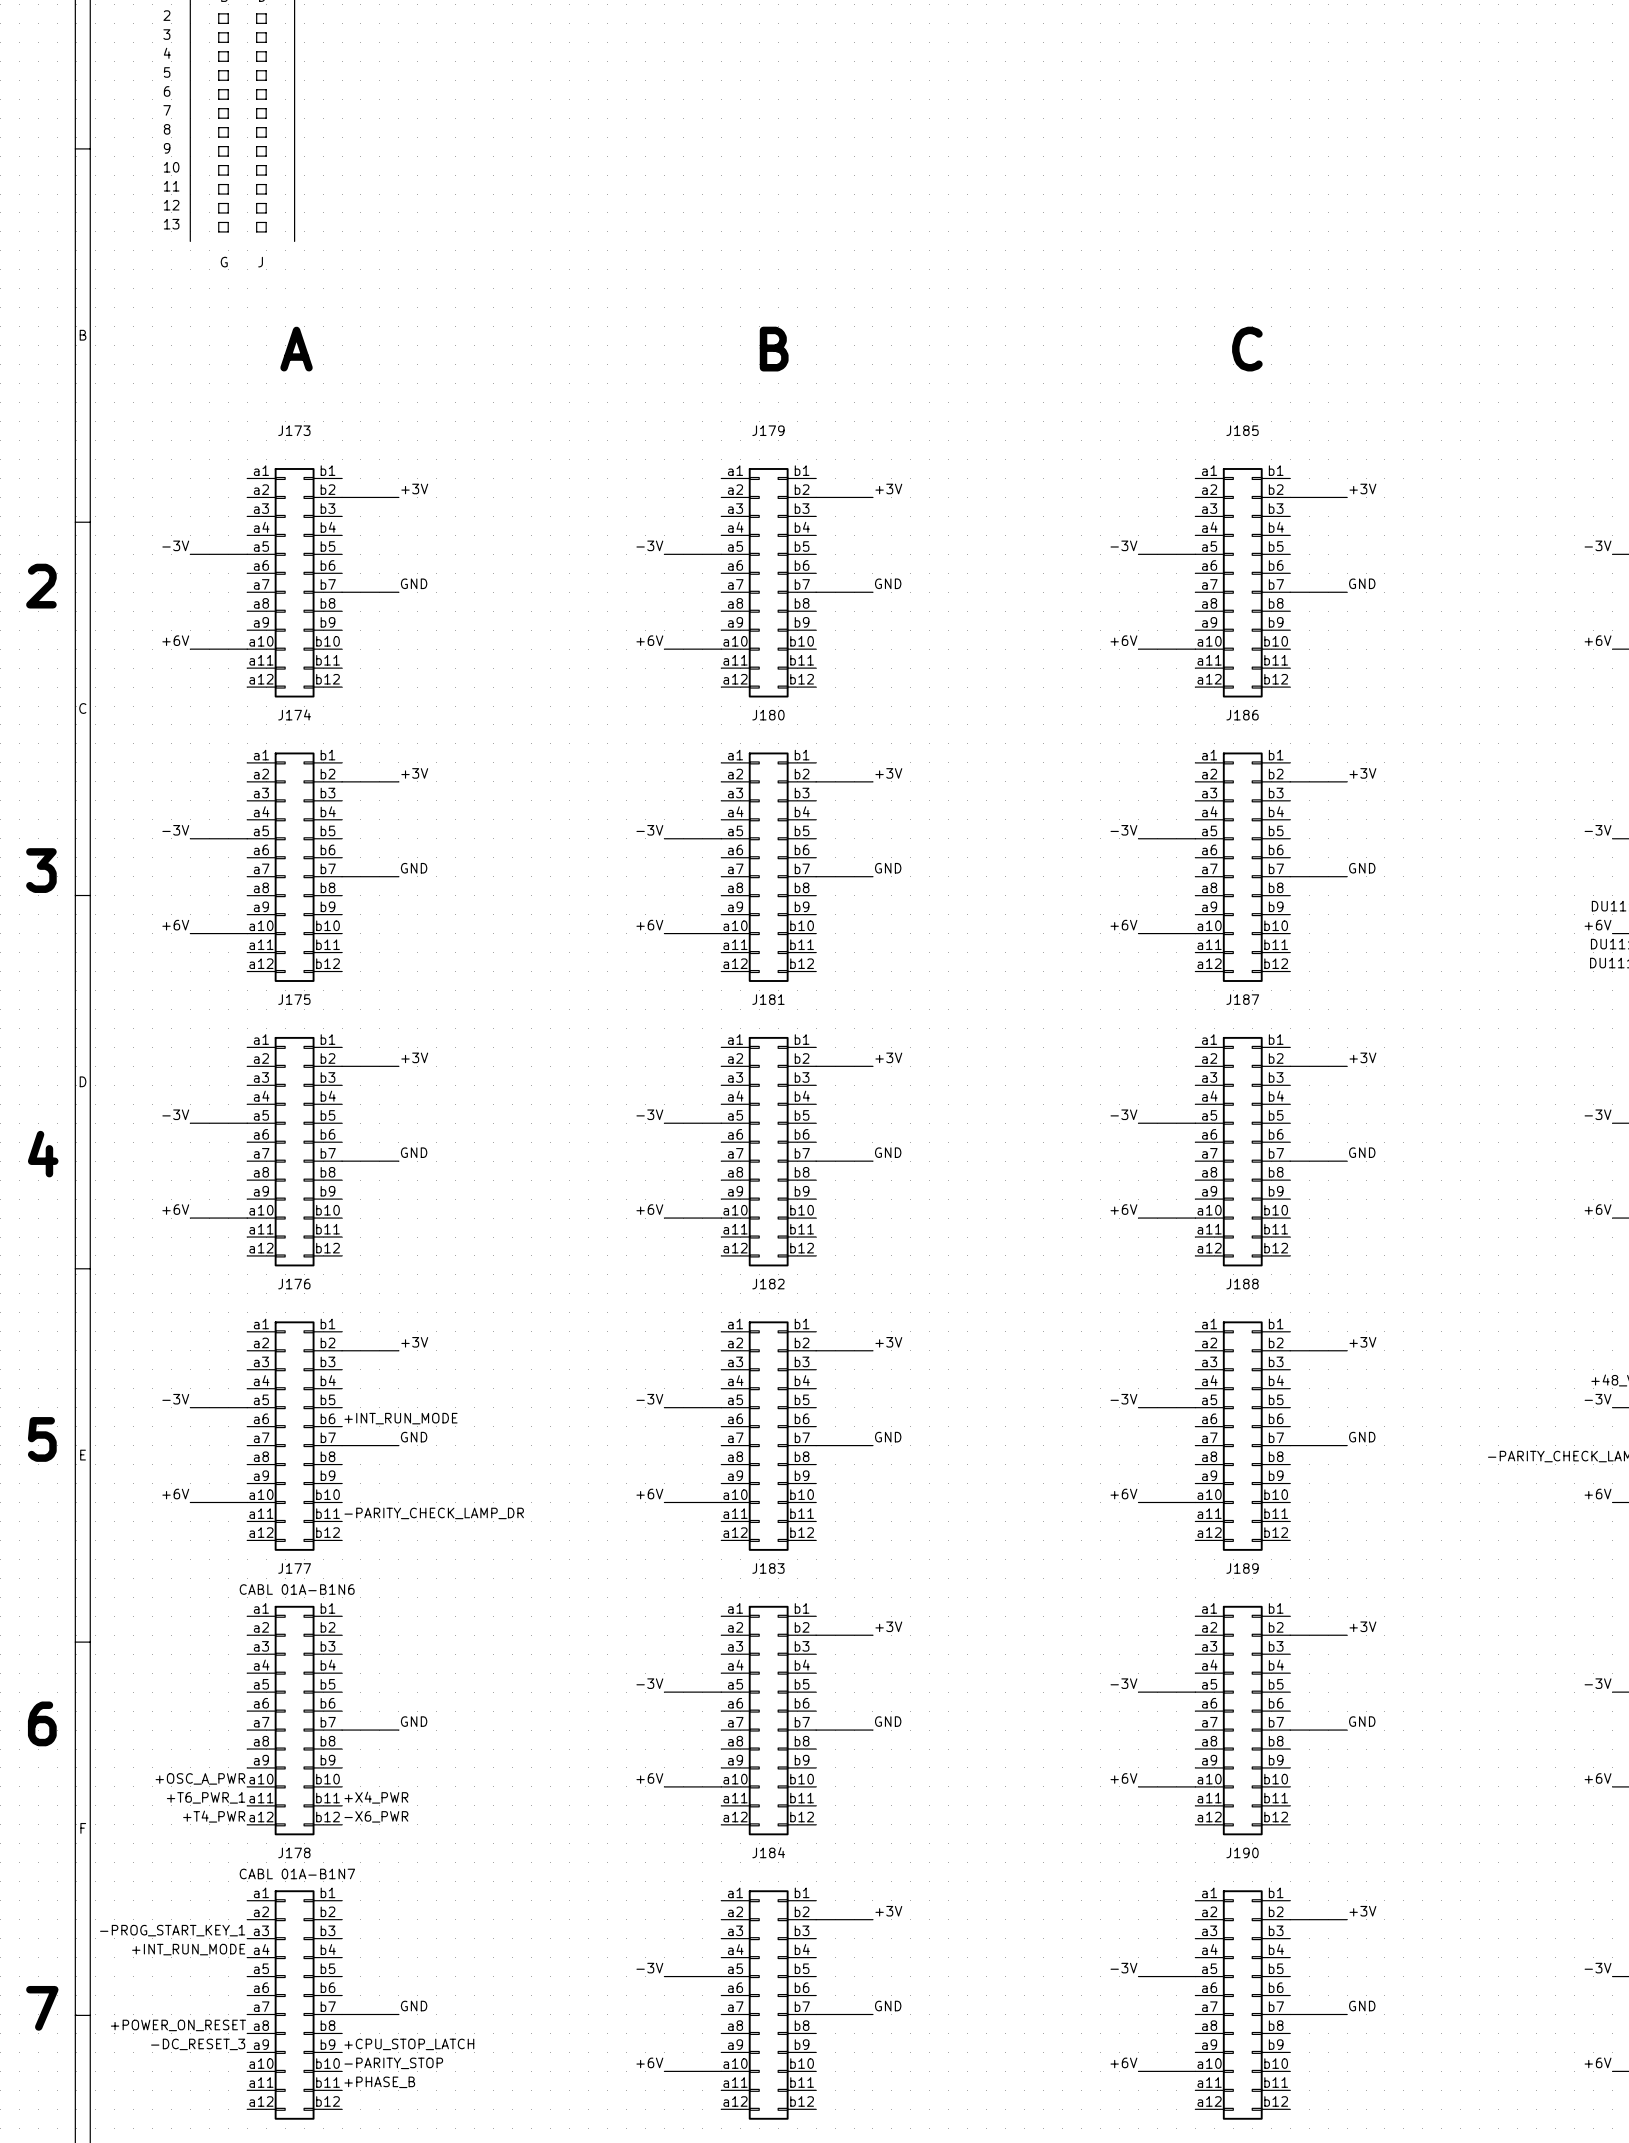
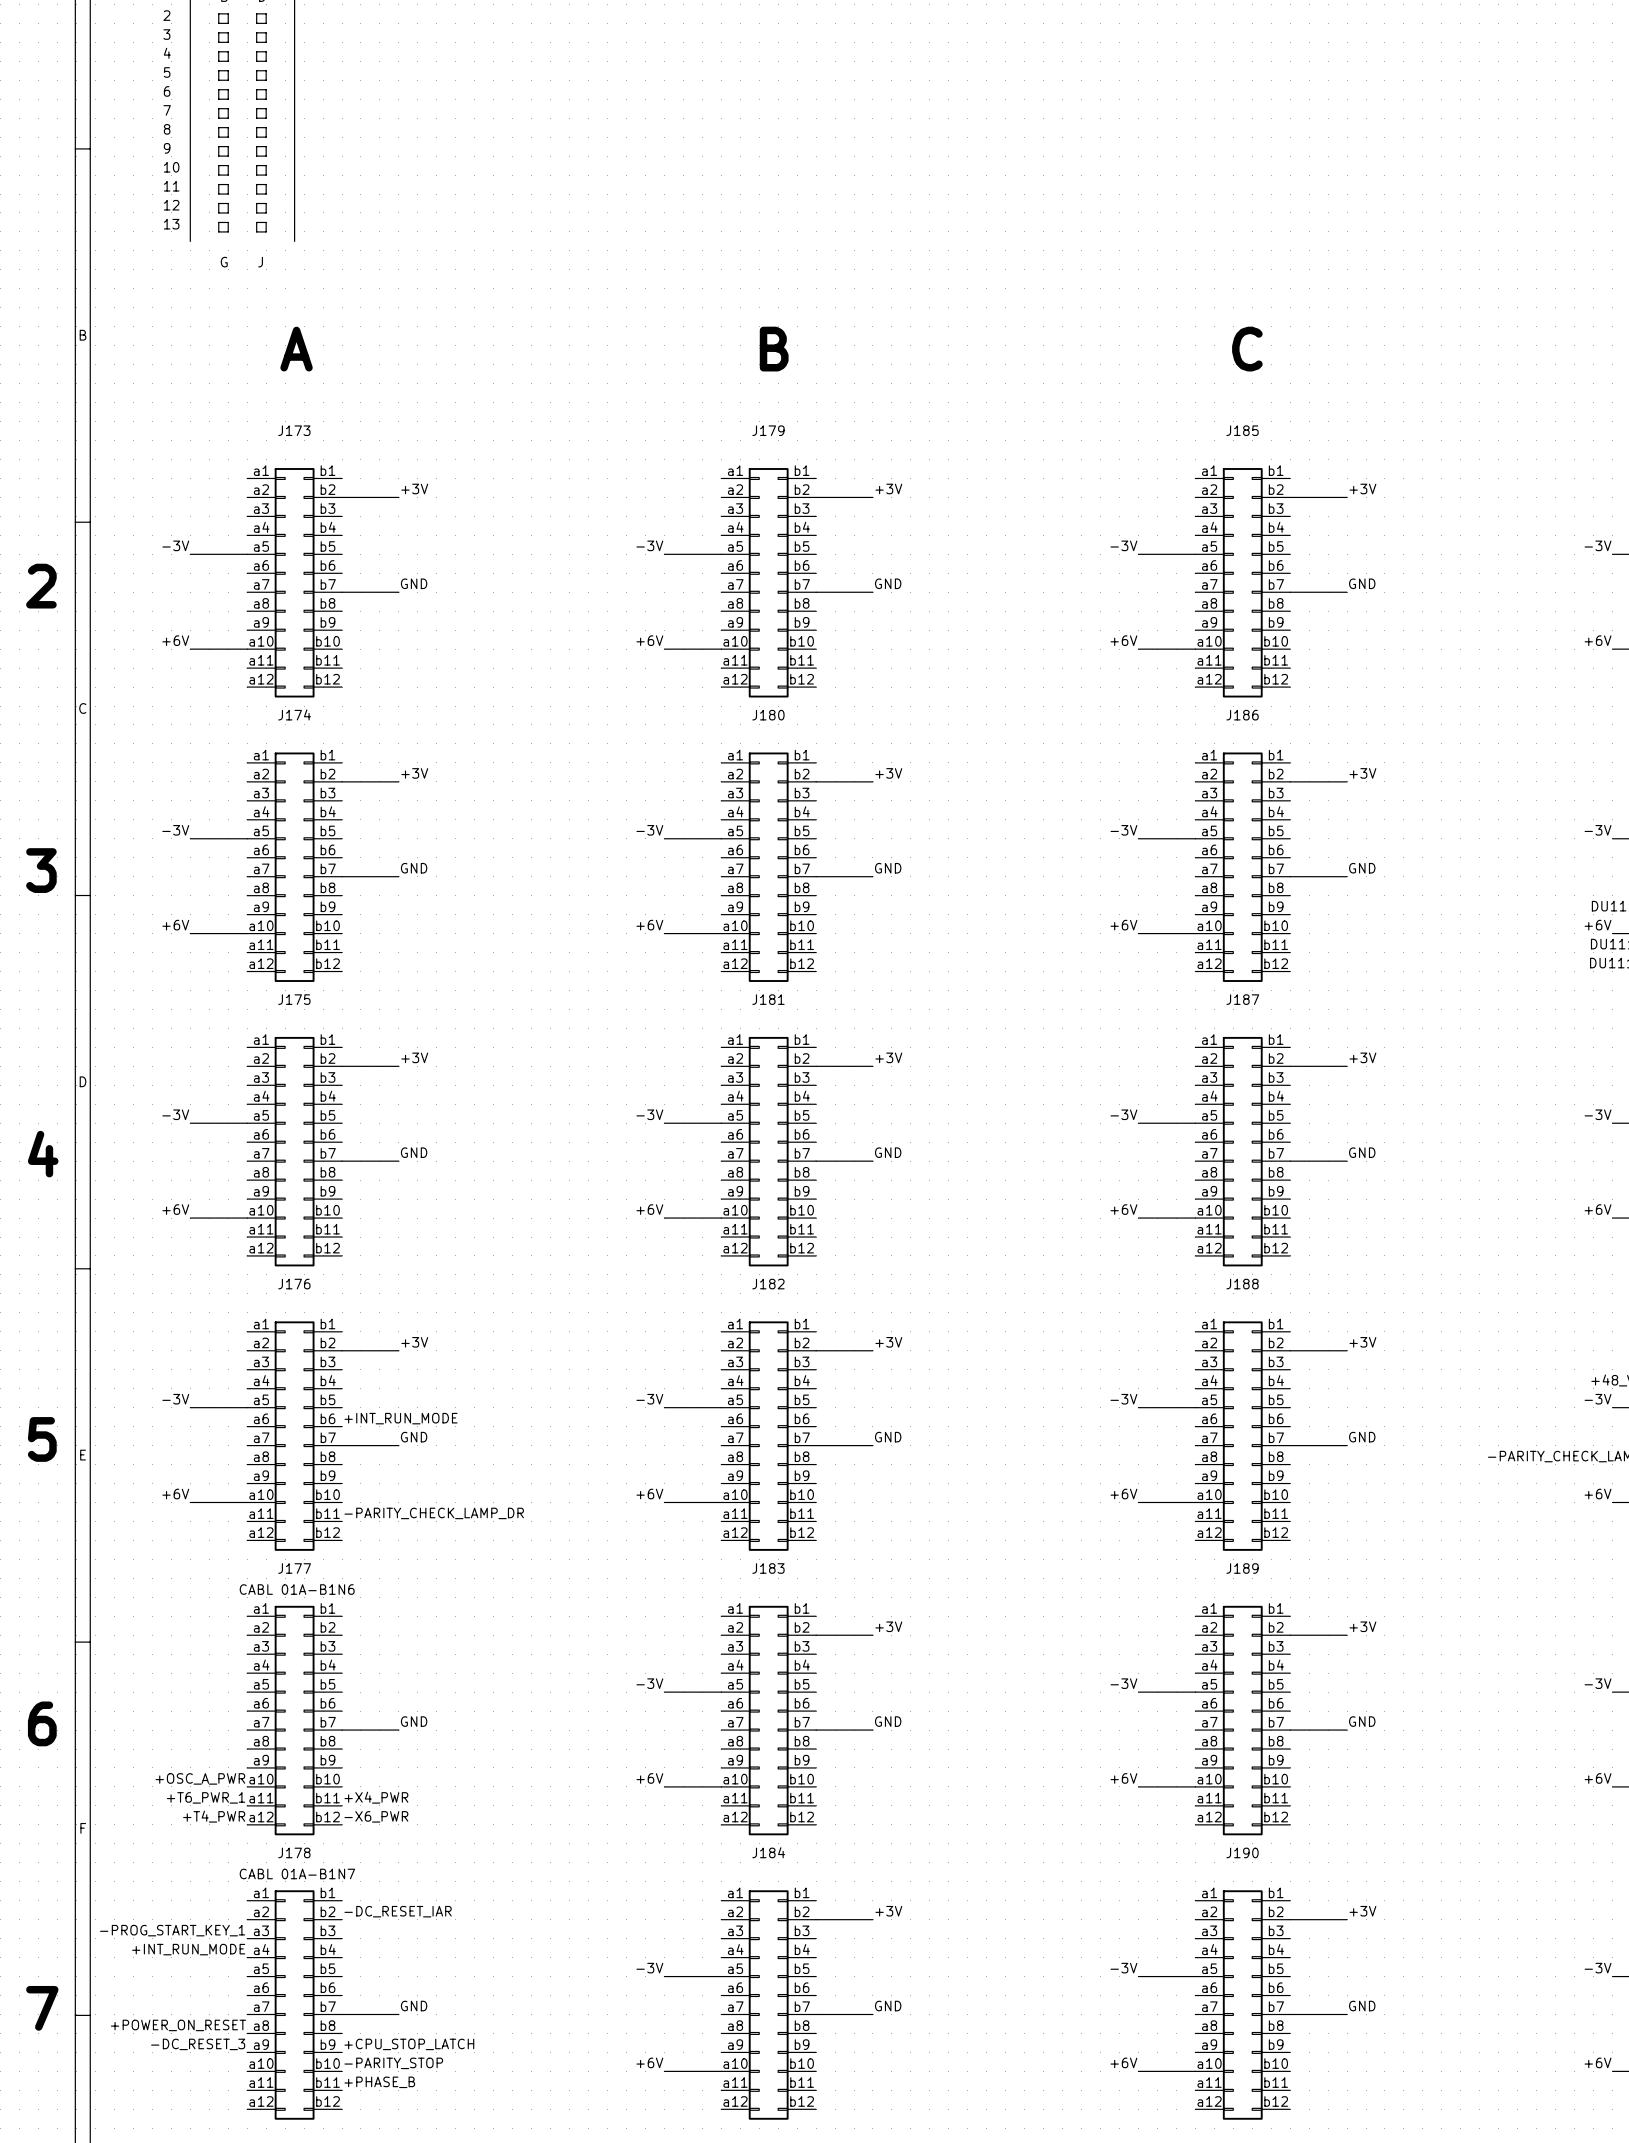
label: none -> -DC_RESET_IAR (398, 1911)

